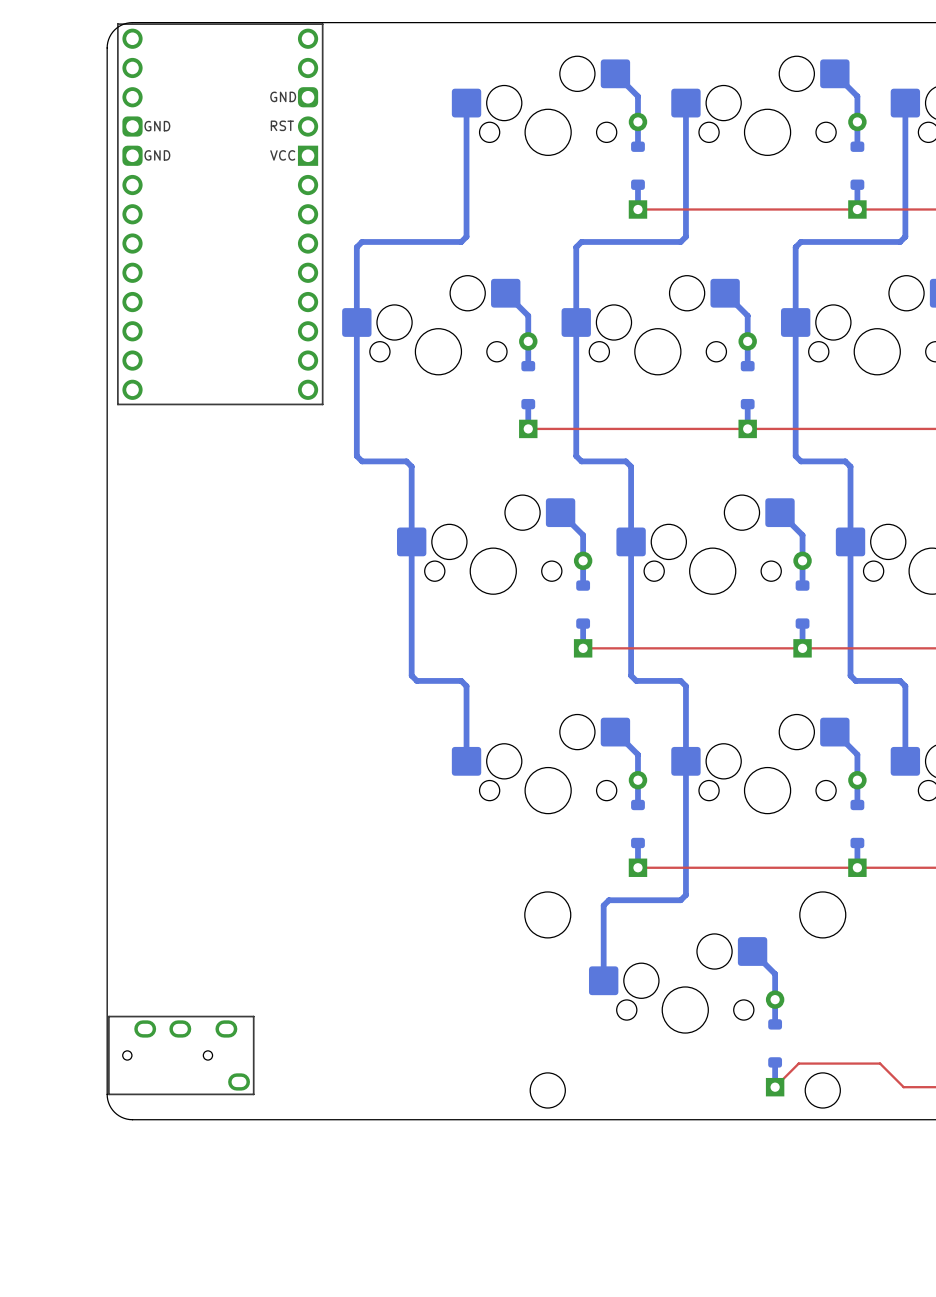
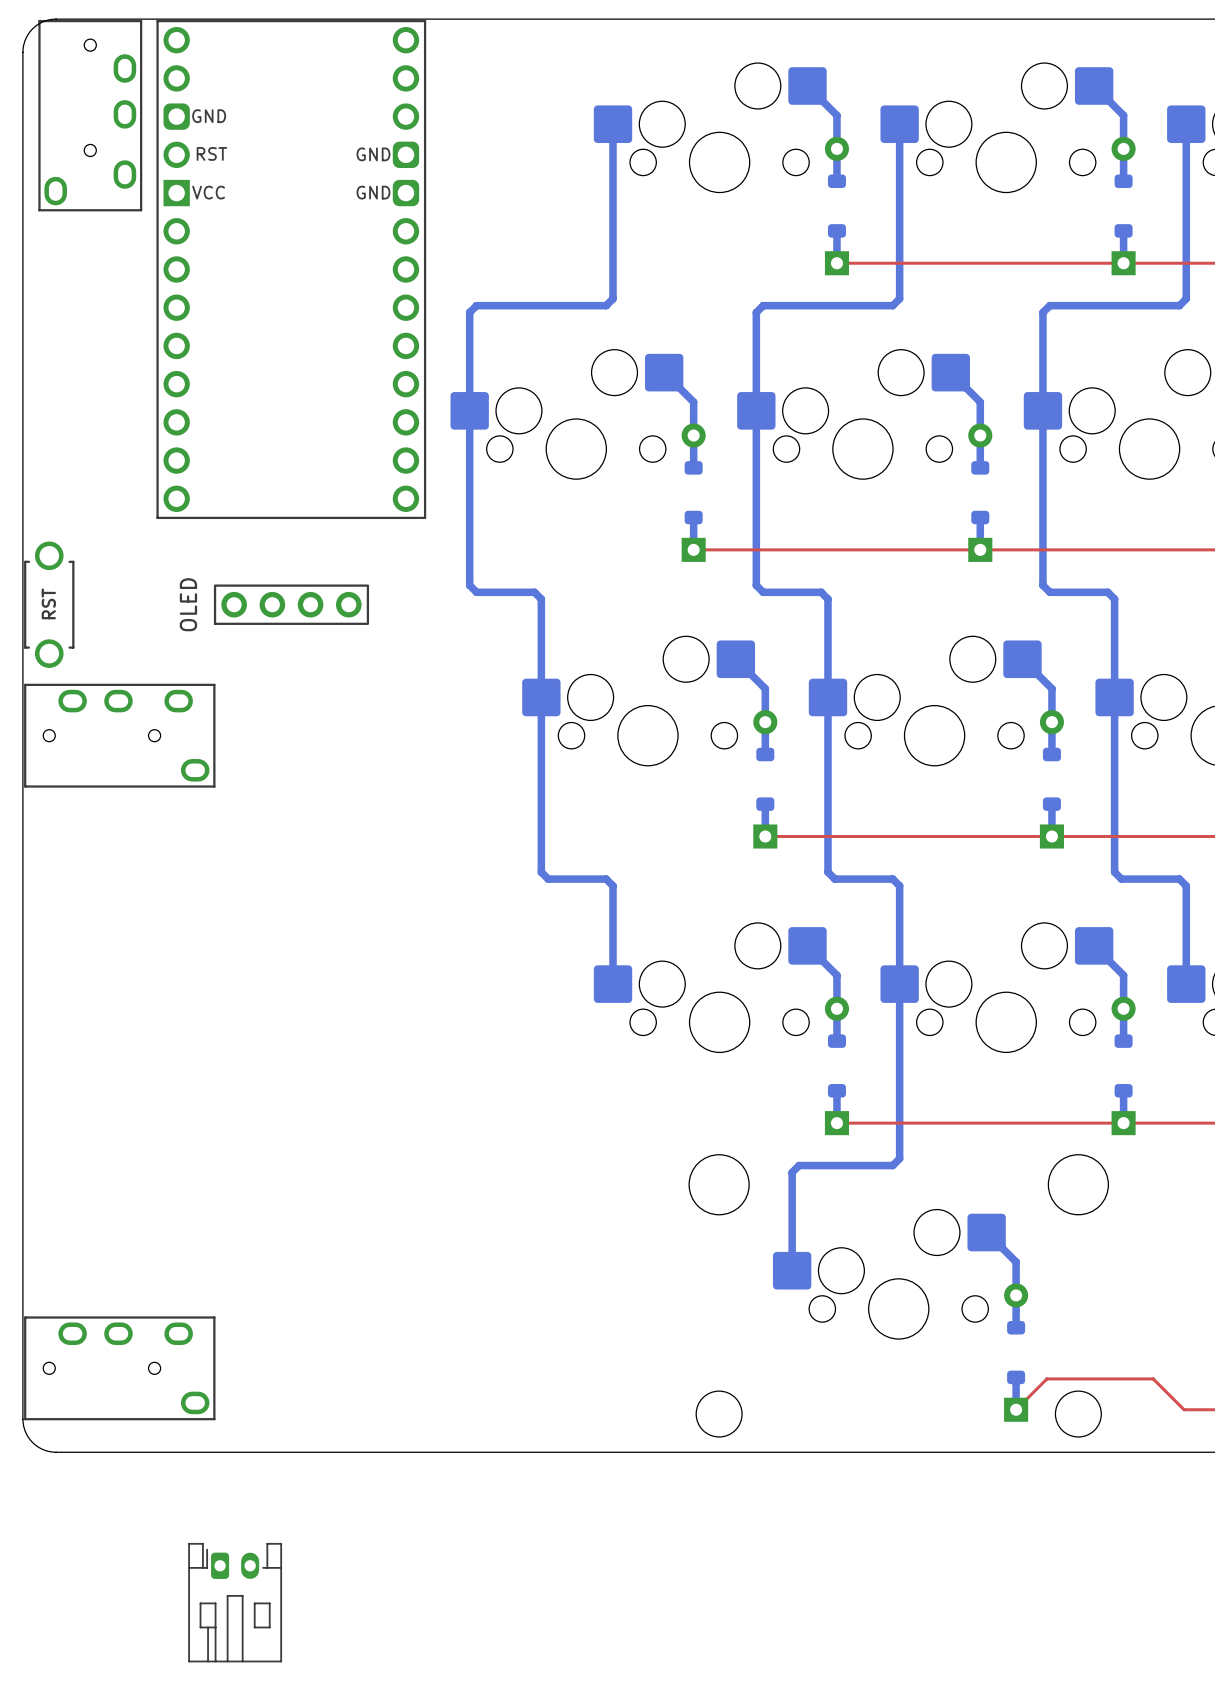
board edge: (132, 22) (121, 25) (114, 30) (109, 36) (107, 47) (107, 1094) (108, 1102) (114, 1112) (121, 1117) (132, 1119) -> (176, 19) (48, 19) (38, 24) (30, 31) (24, 41) (22, 52) (23, 1422) (26, 1433) (32, 1442) (48, 1451) (176, 1452)
part: none -> (90, 115)
part side: top (220, 214) -> bottom (291, 269)
part: none -> (49, 604)
part: none -> OLED (291, 604)
part: none -> (119, 735)
part position: (181, 1055) -> (119, 1368)
part: none -> (235, 1602)

